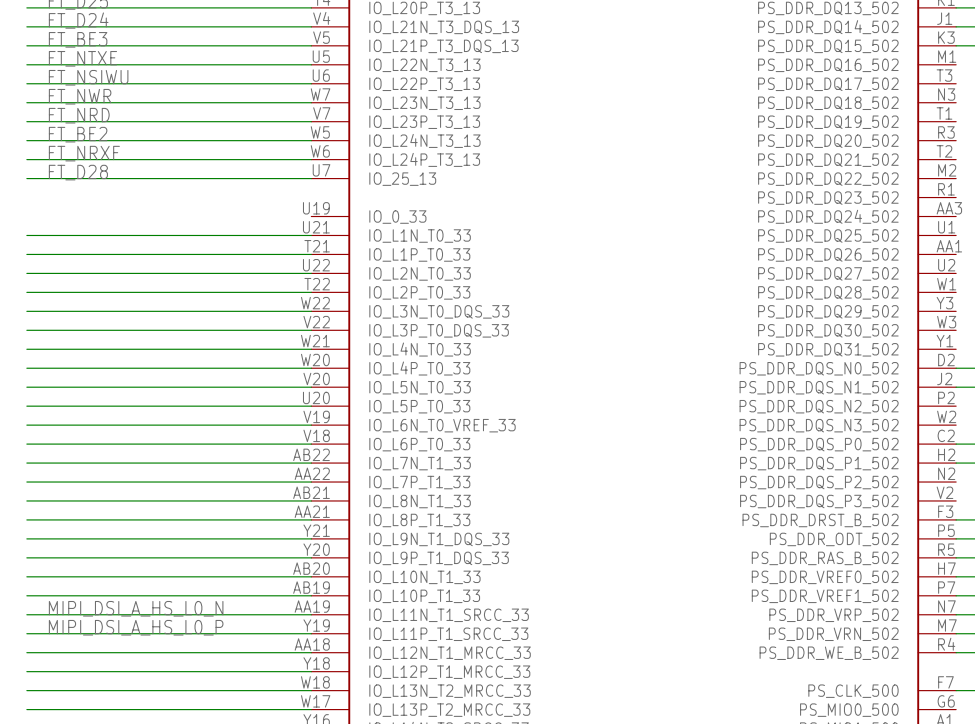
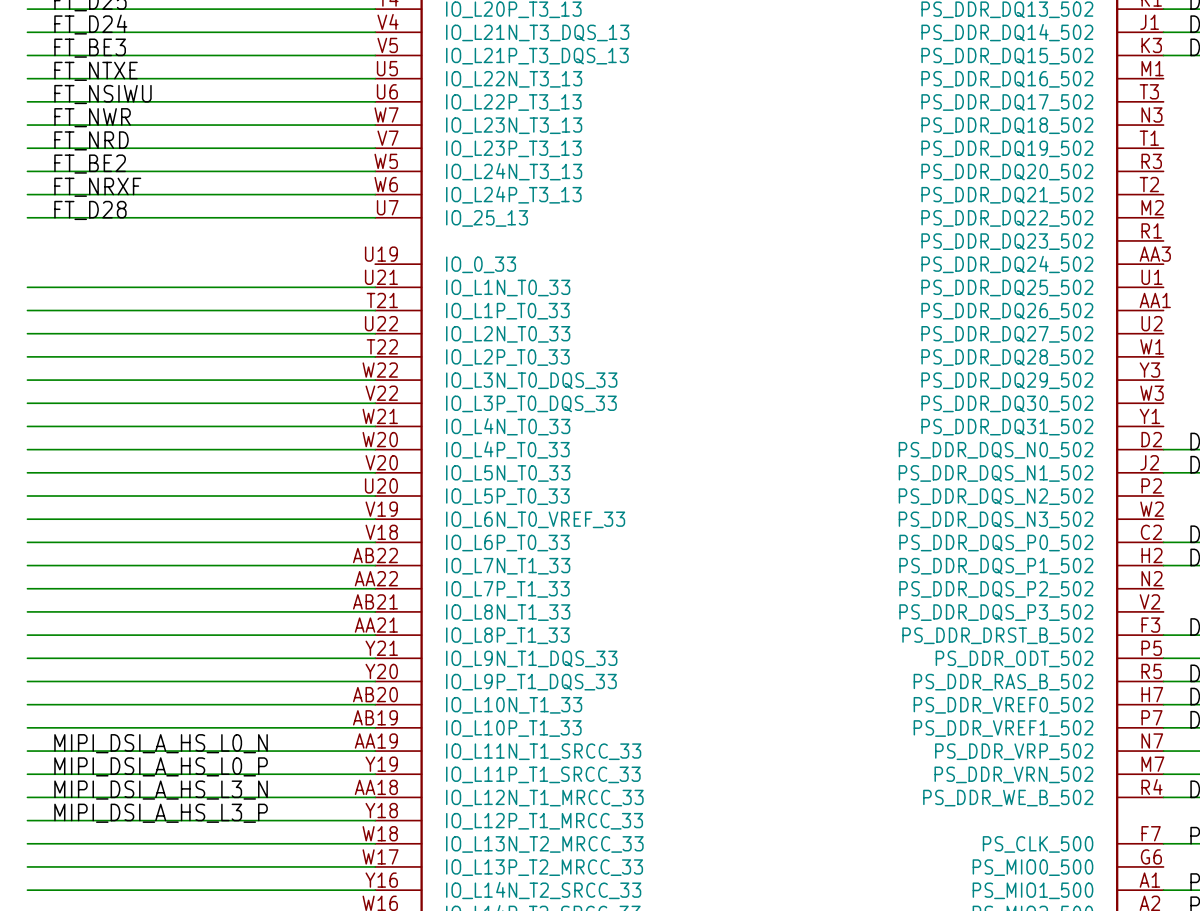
label: none -> MIPI_DSI_A_HS_L3_N (161, 790)
label: none -> MIPI_DSI_A_HS_L3_P (161, 813)

